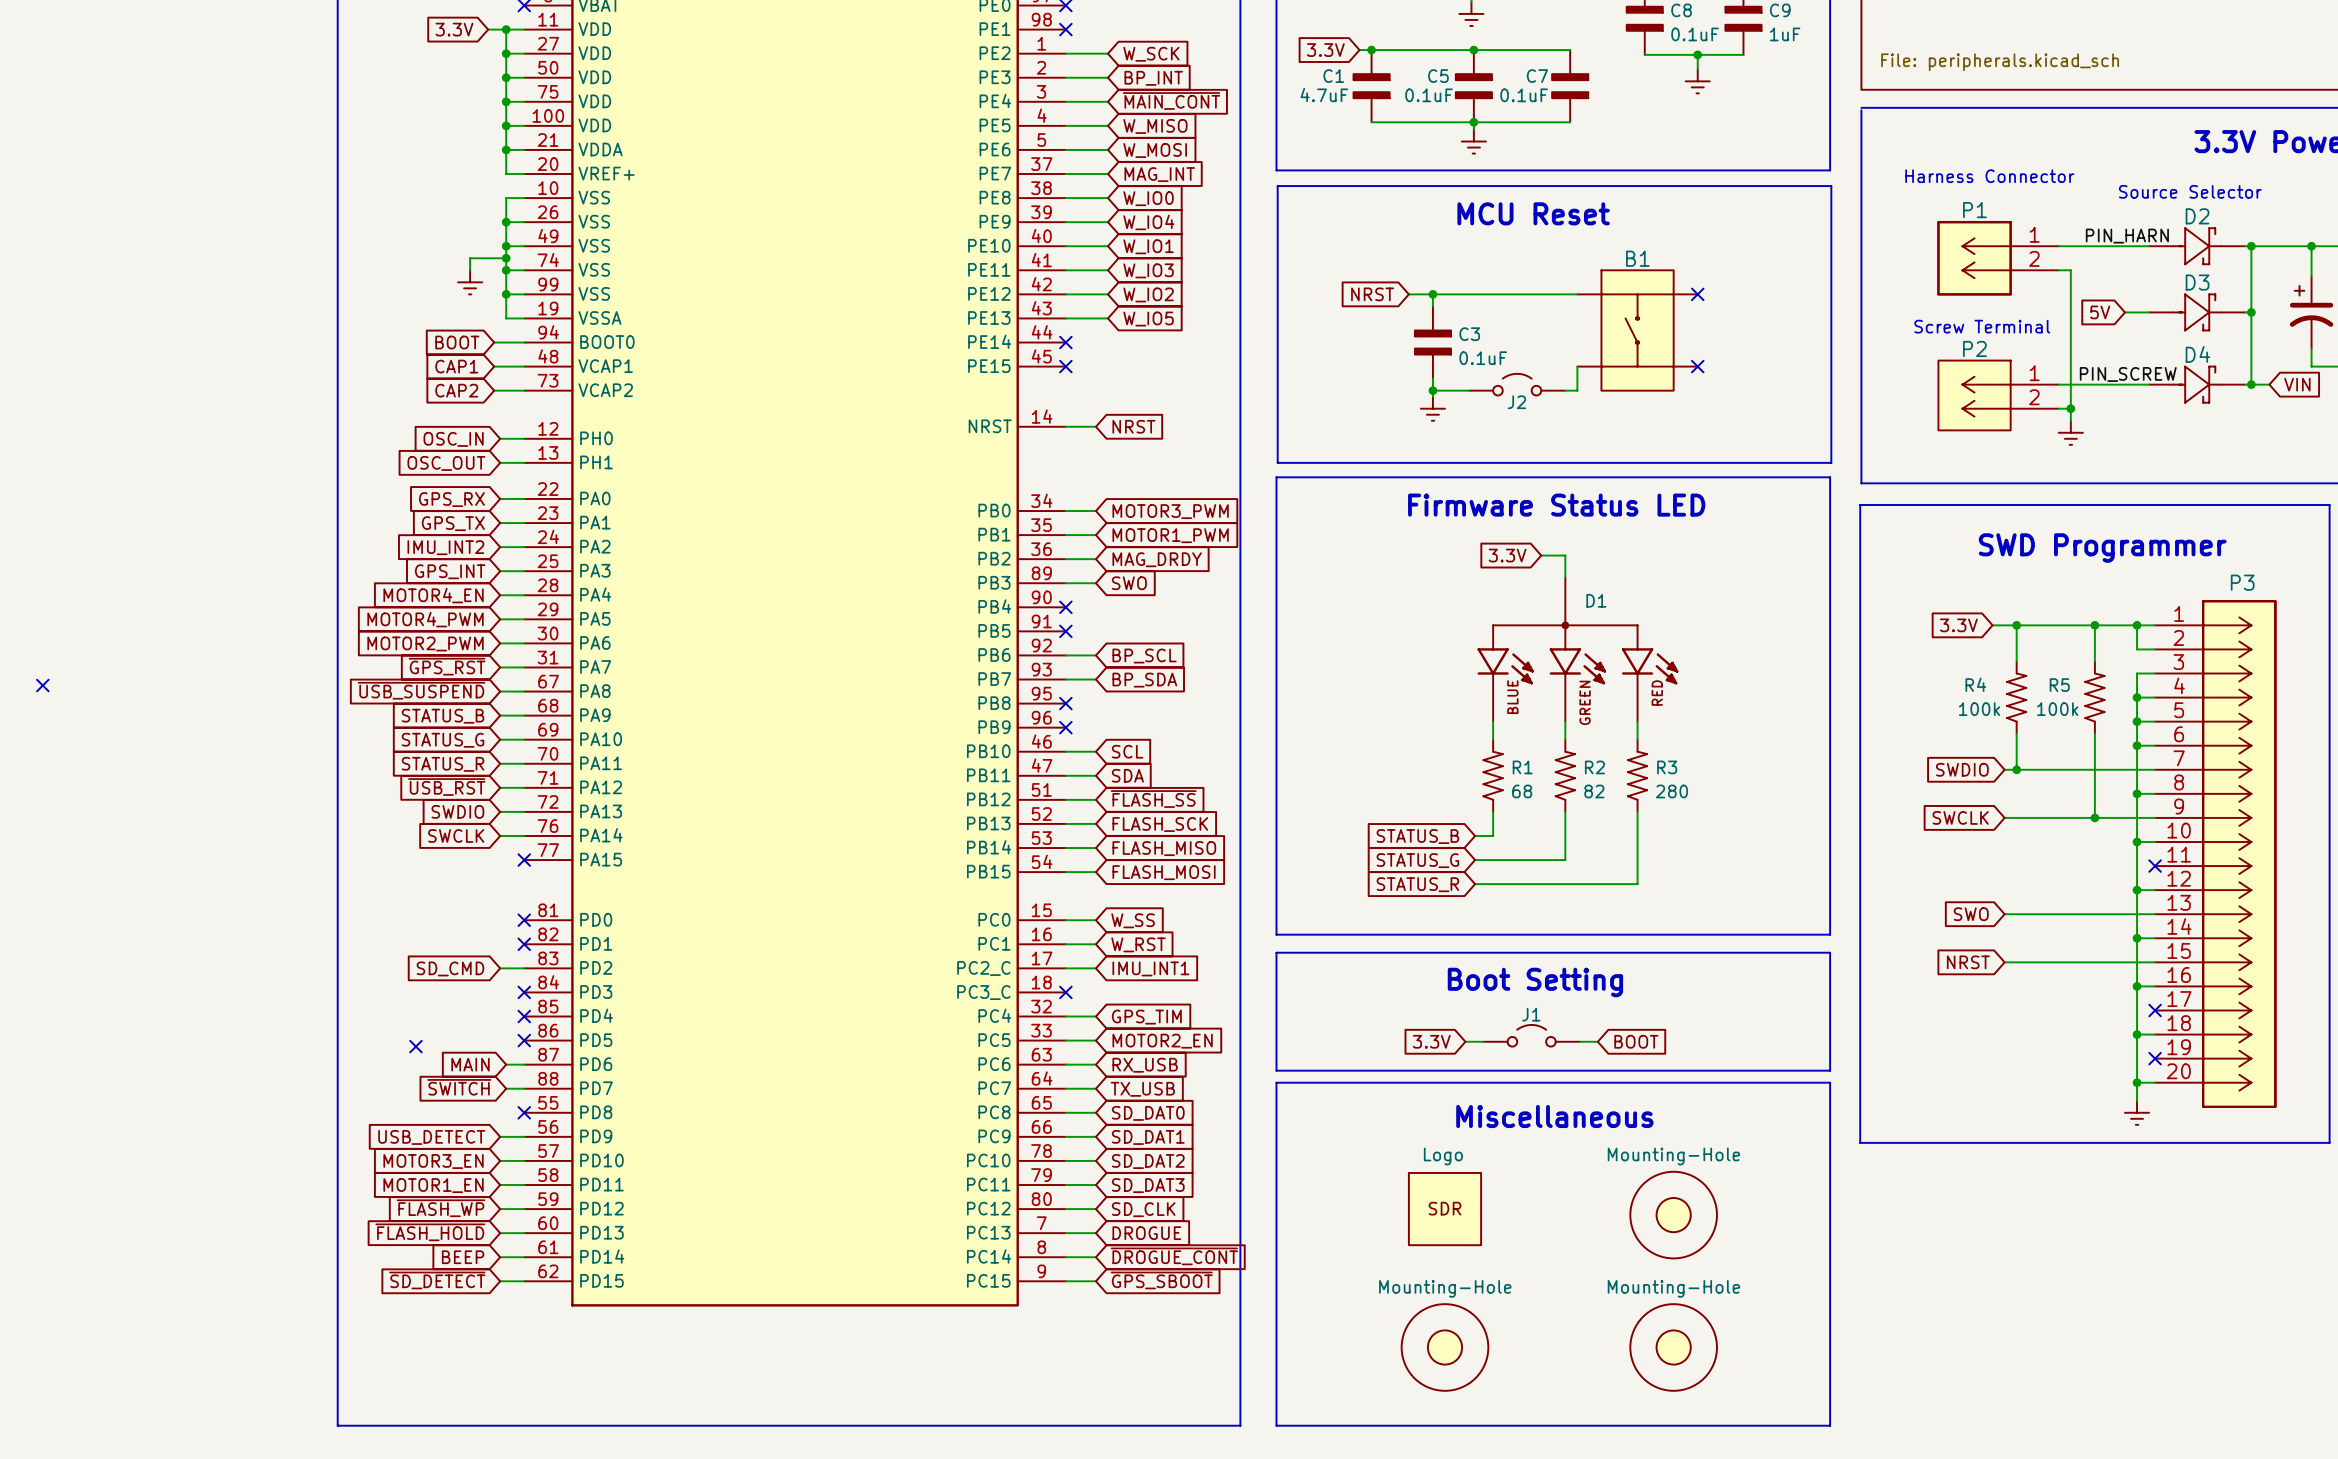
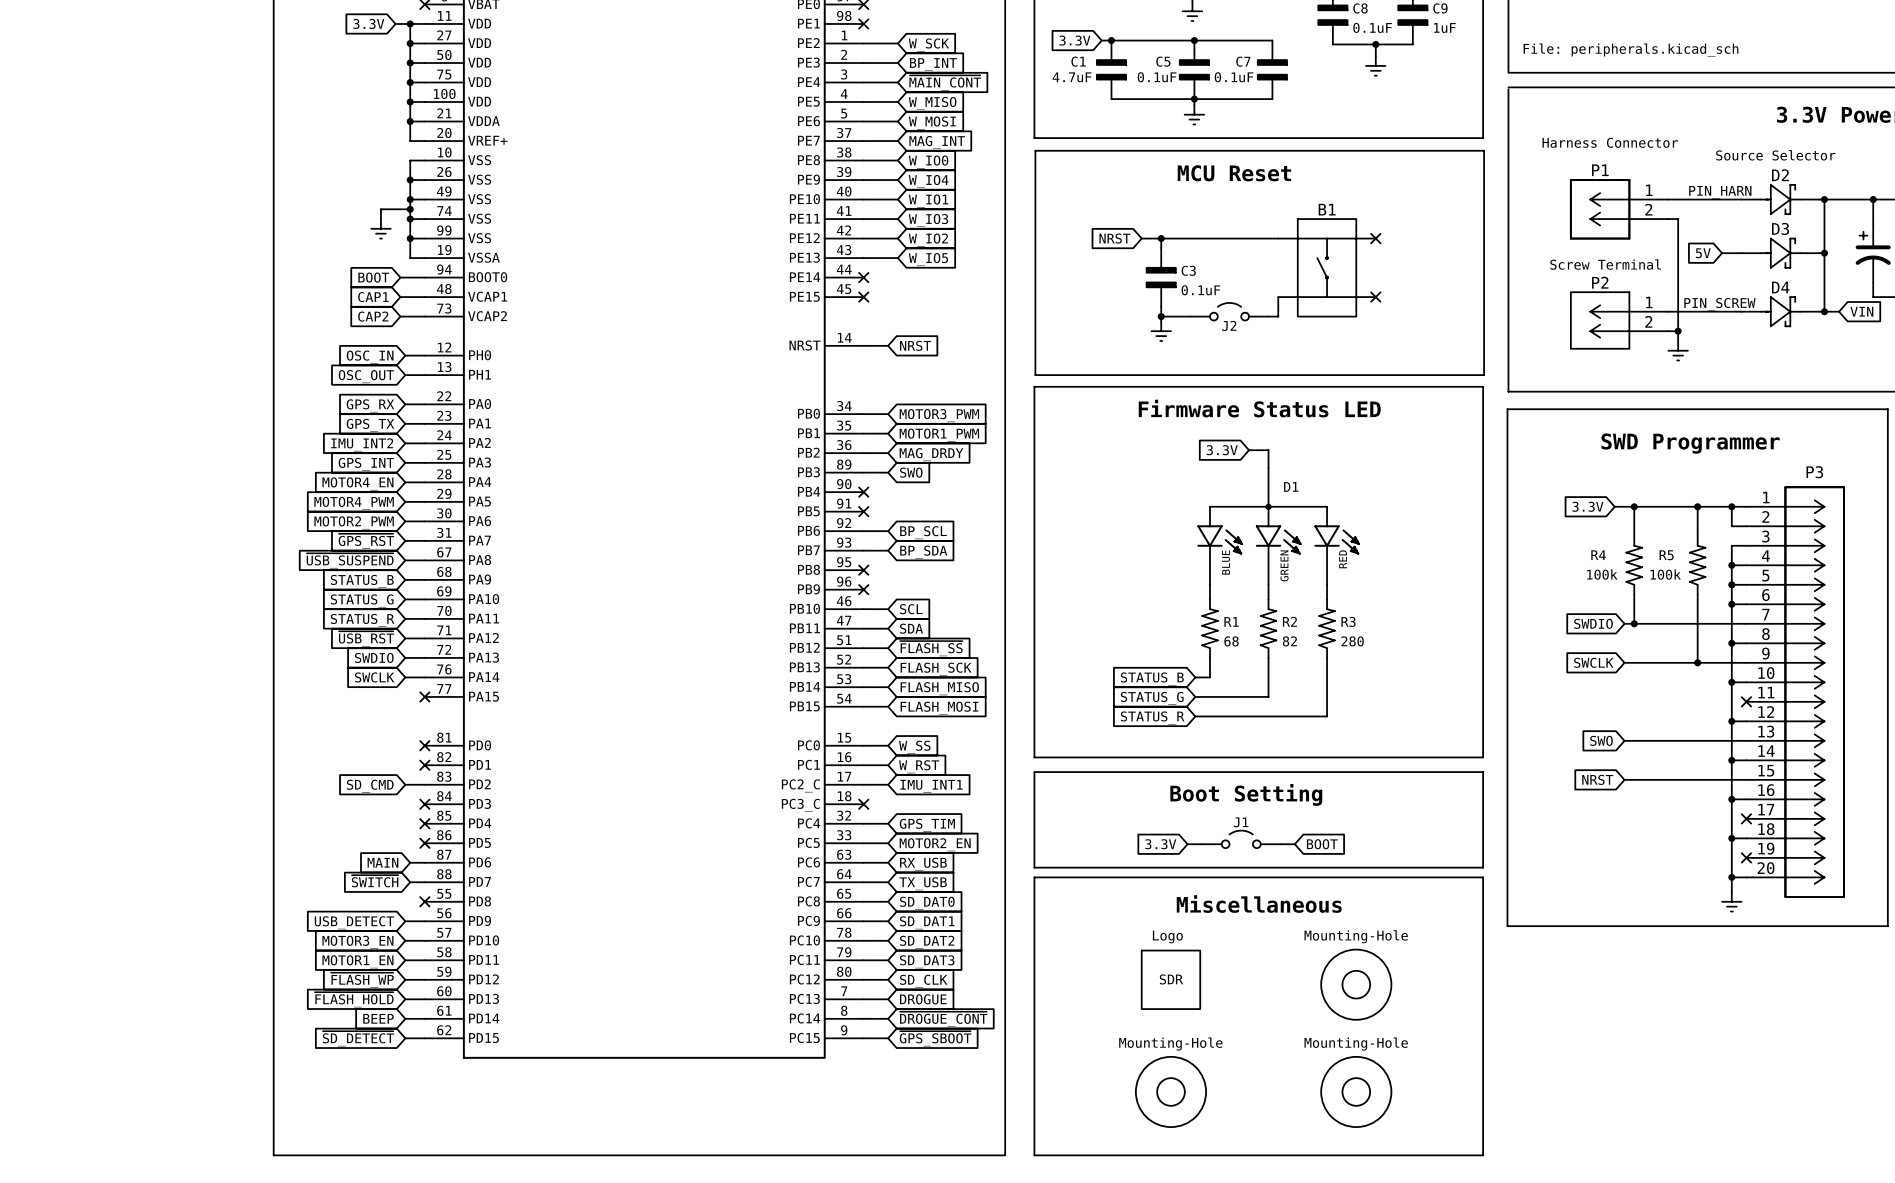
no-connect mark: (42, 685) -> none
no-connect mark: (415, 1046) -> none

